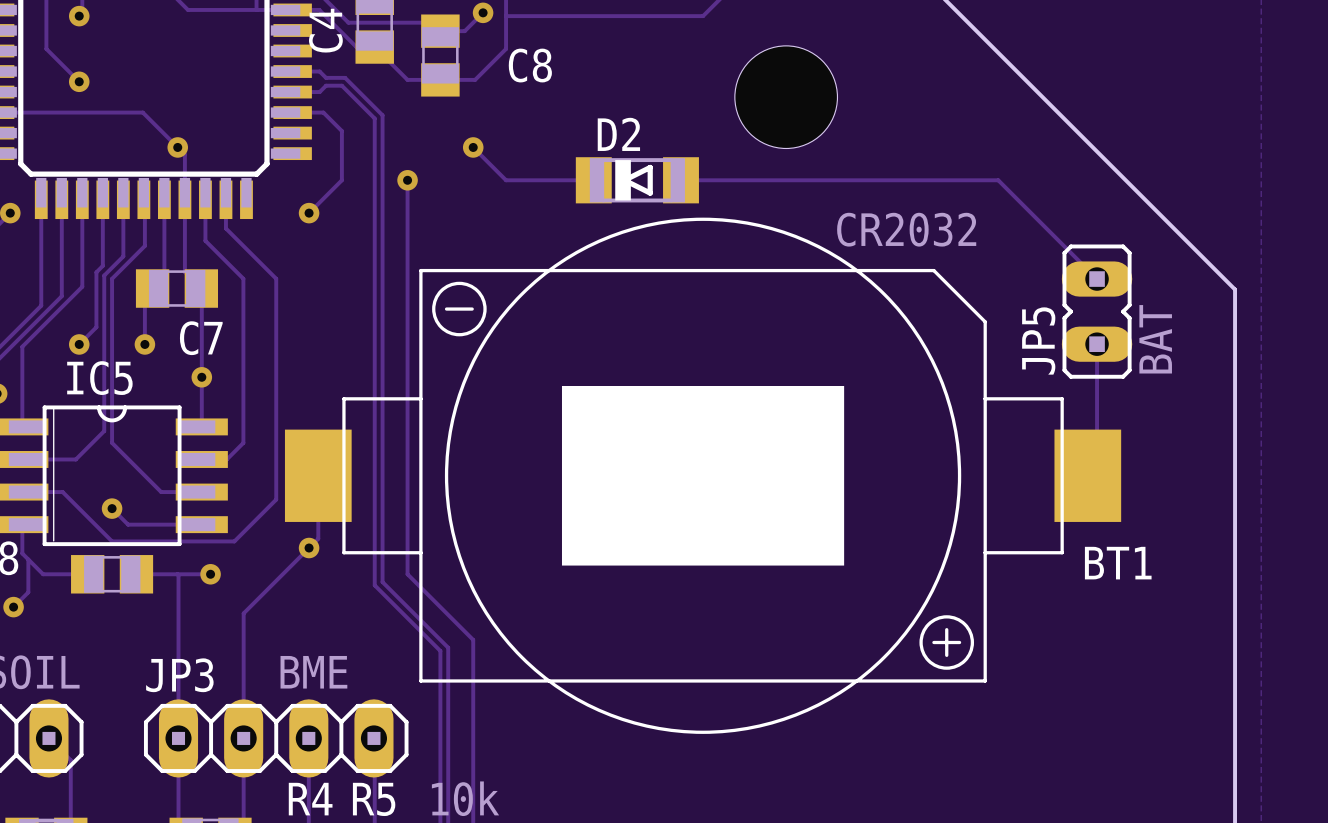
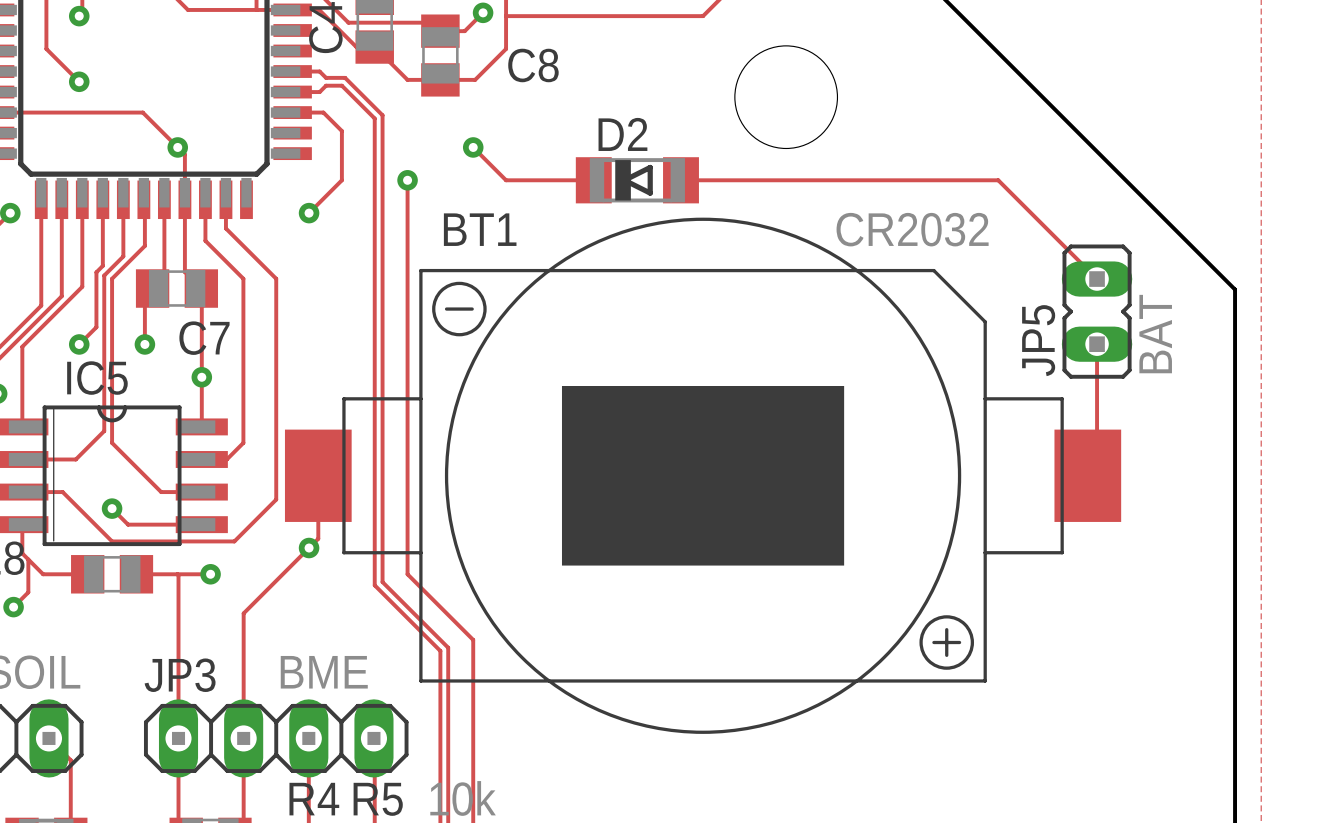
BT1 name position: BT1 (1118, 563) -> BT1 (480, 229)

